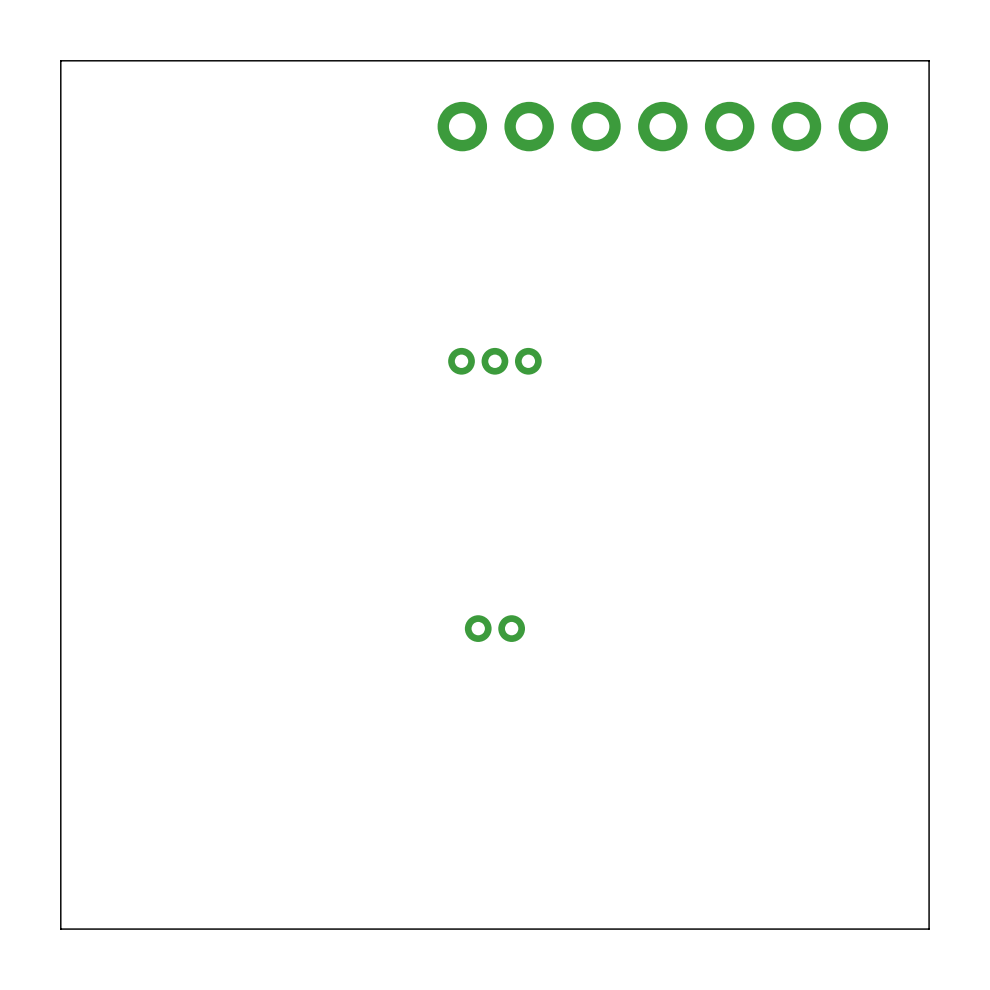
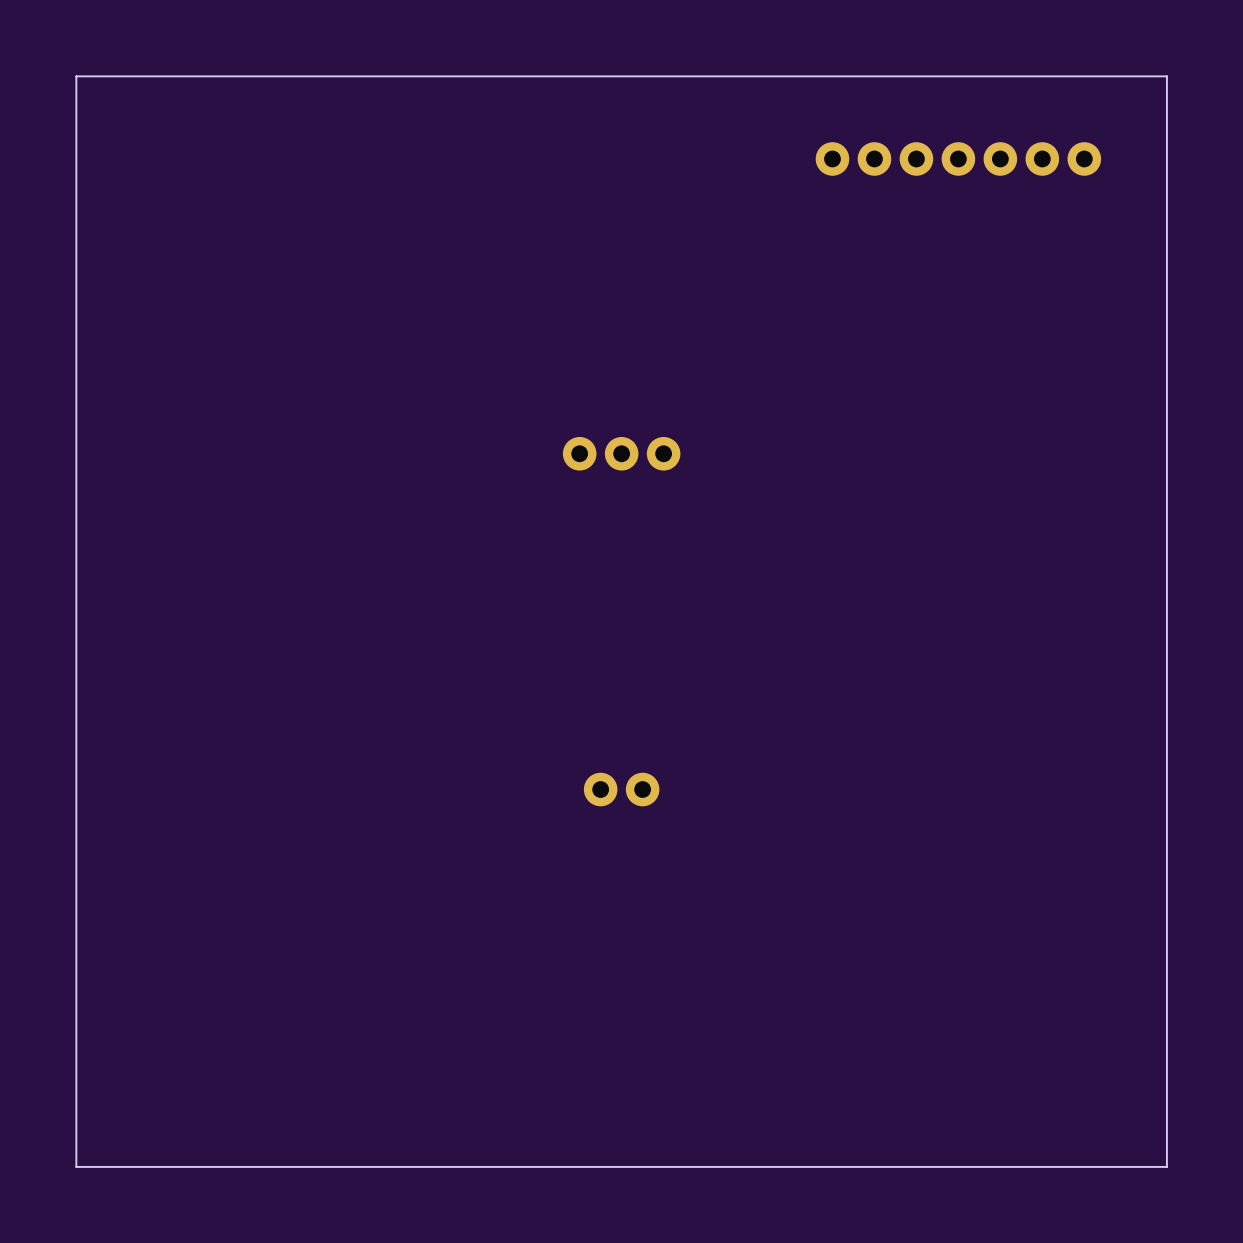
part: (662, 126) -> none
part: none -> (958, 158)

